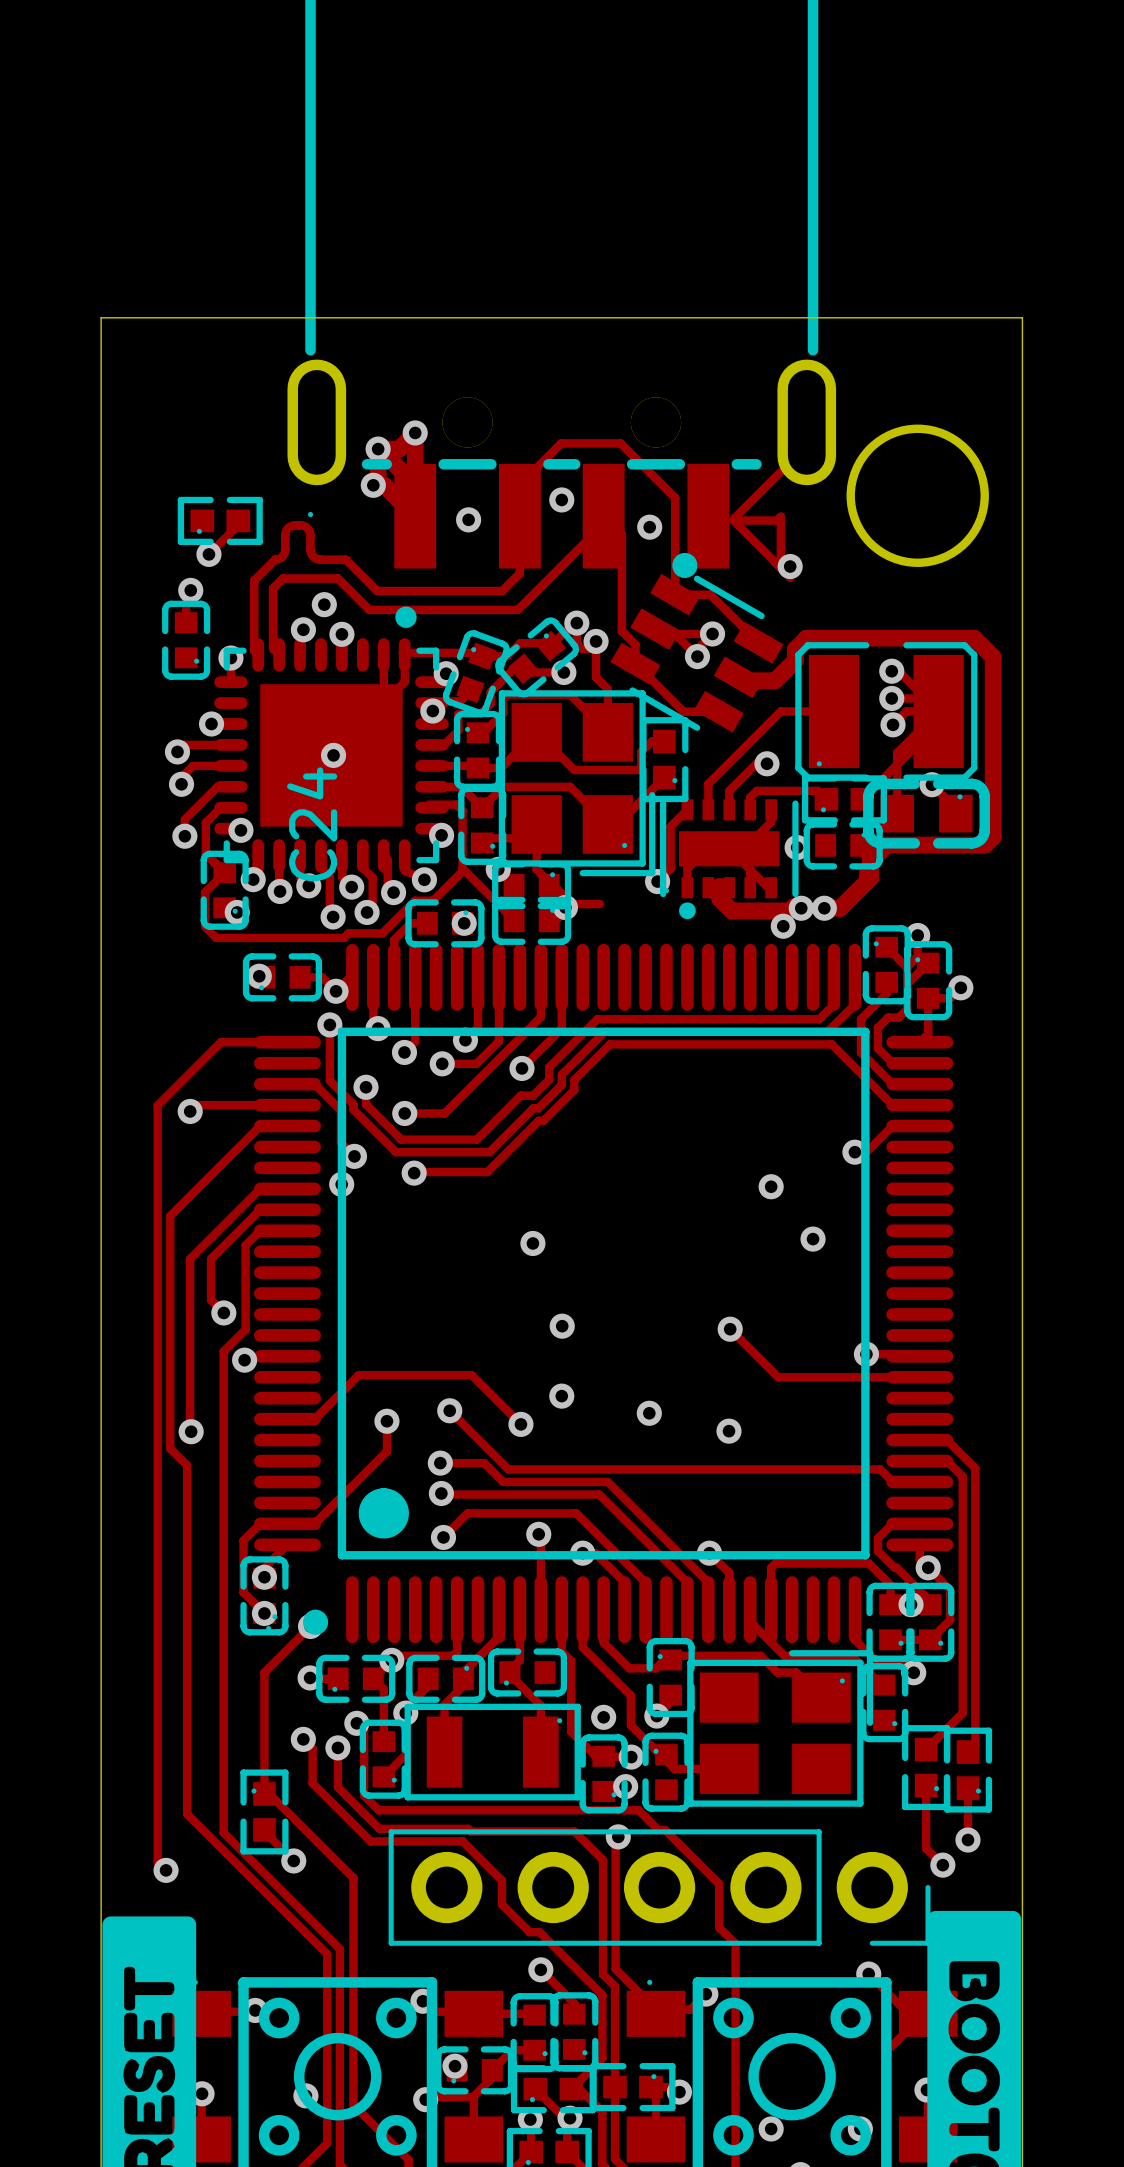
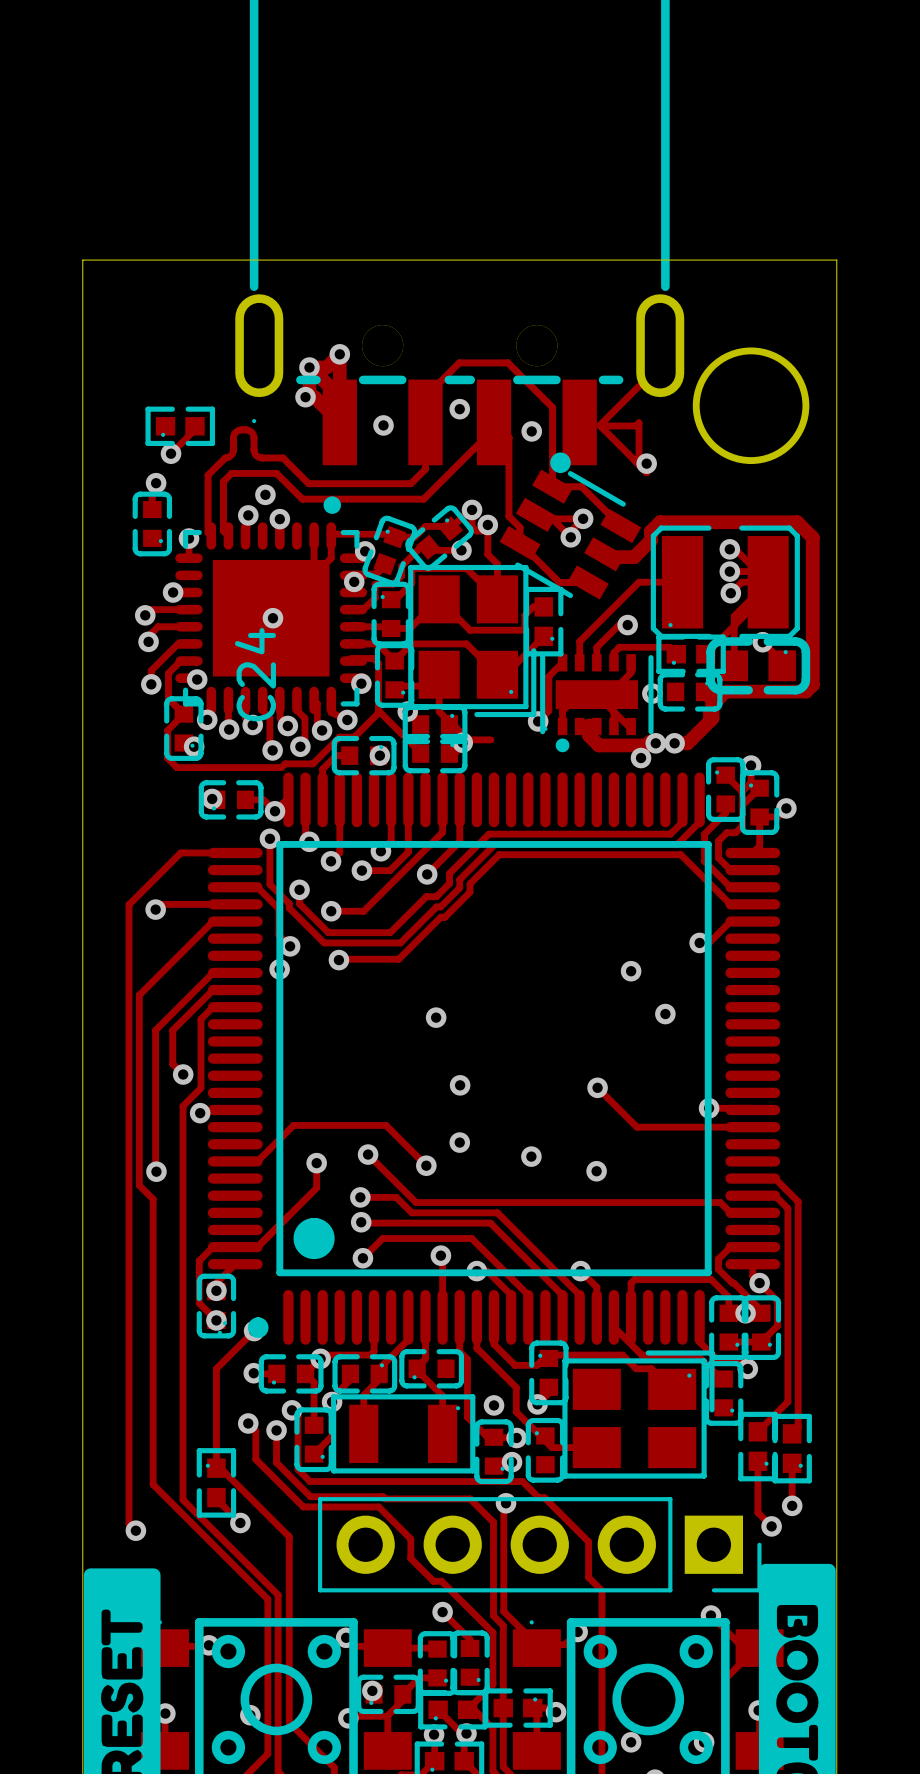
part footprint: [388, 1829, 931, 1946] -> [318, 1497, 762, 1593]

